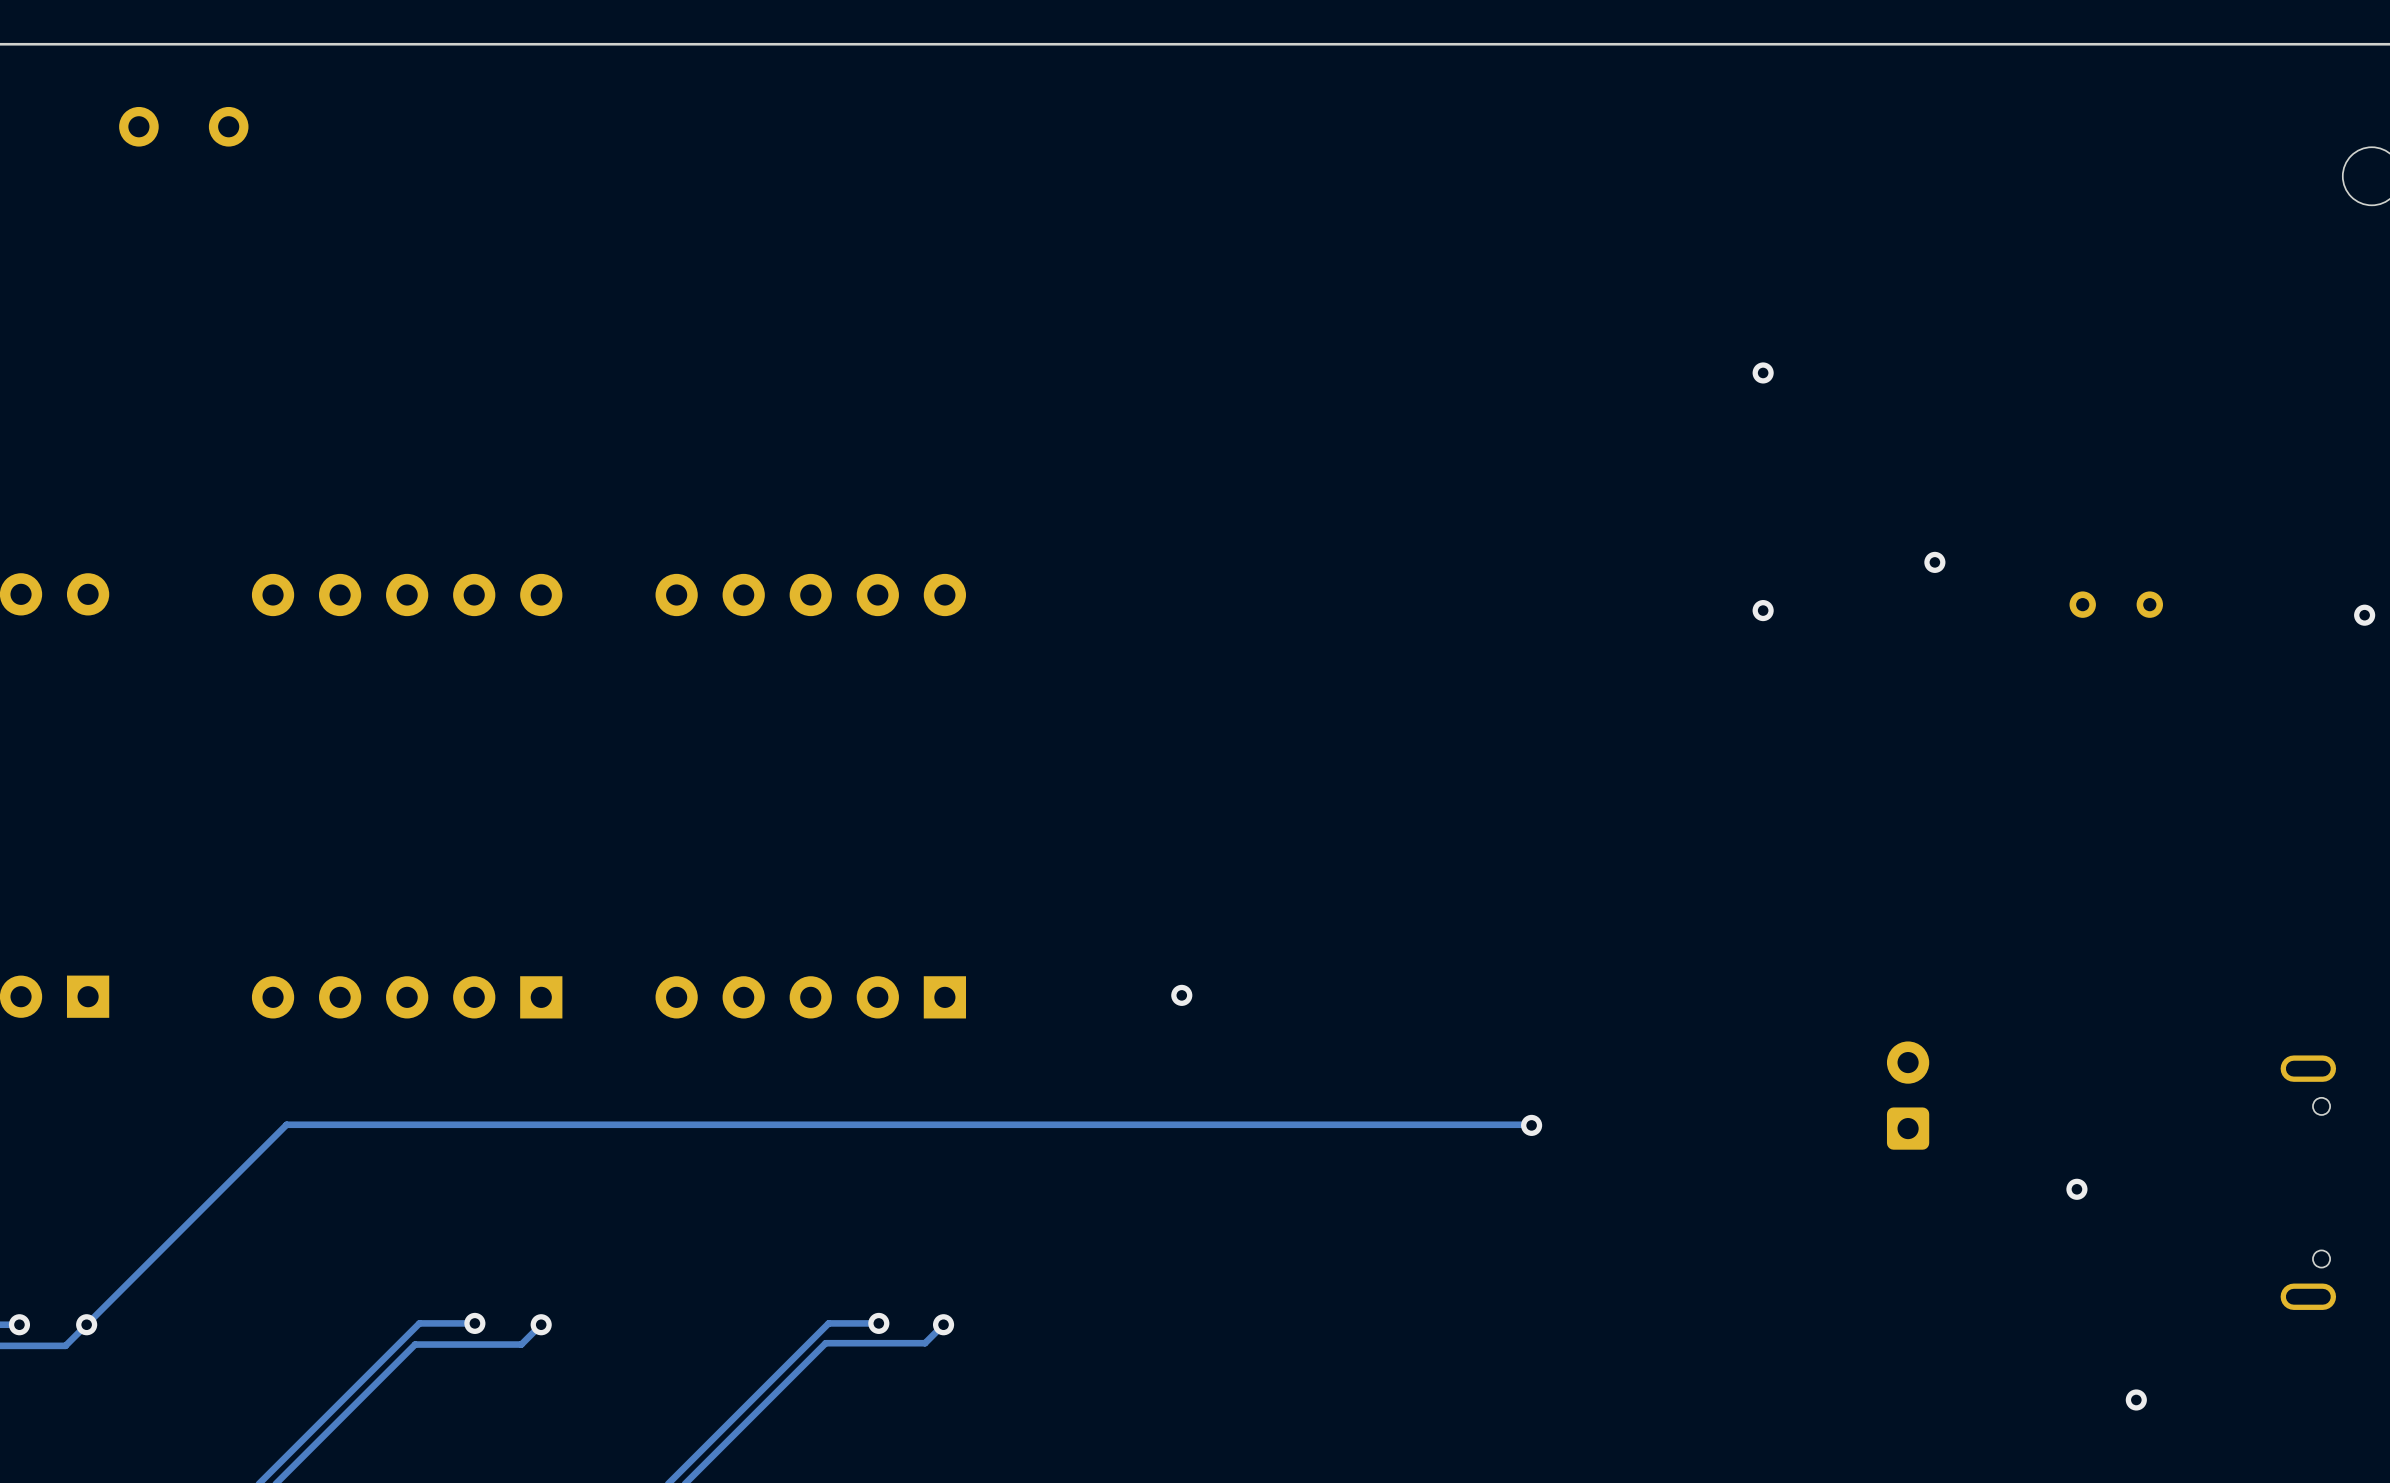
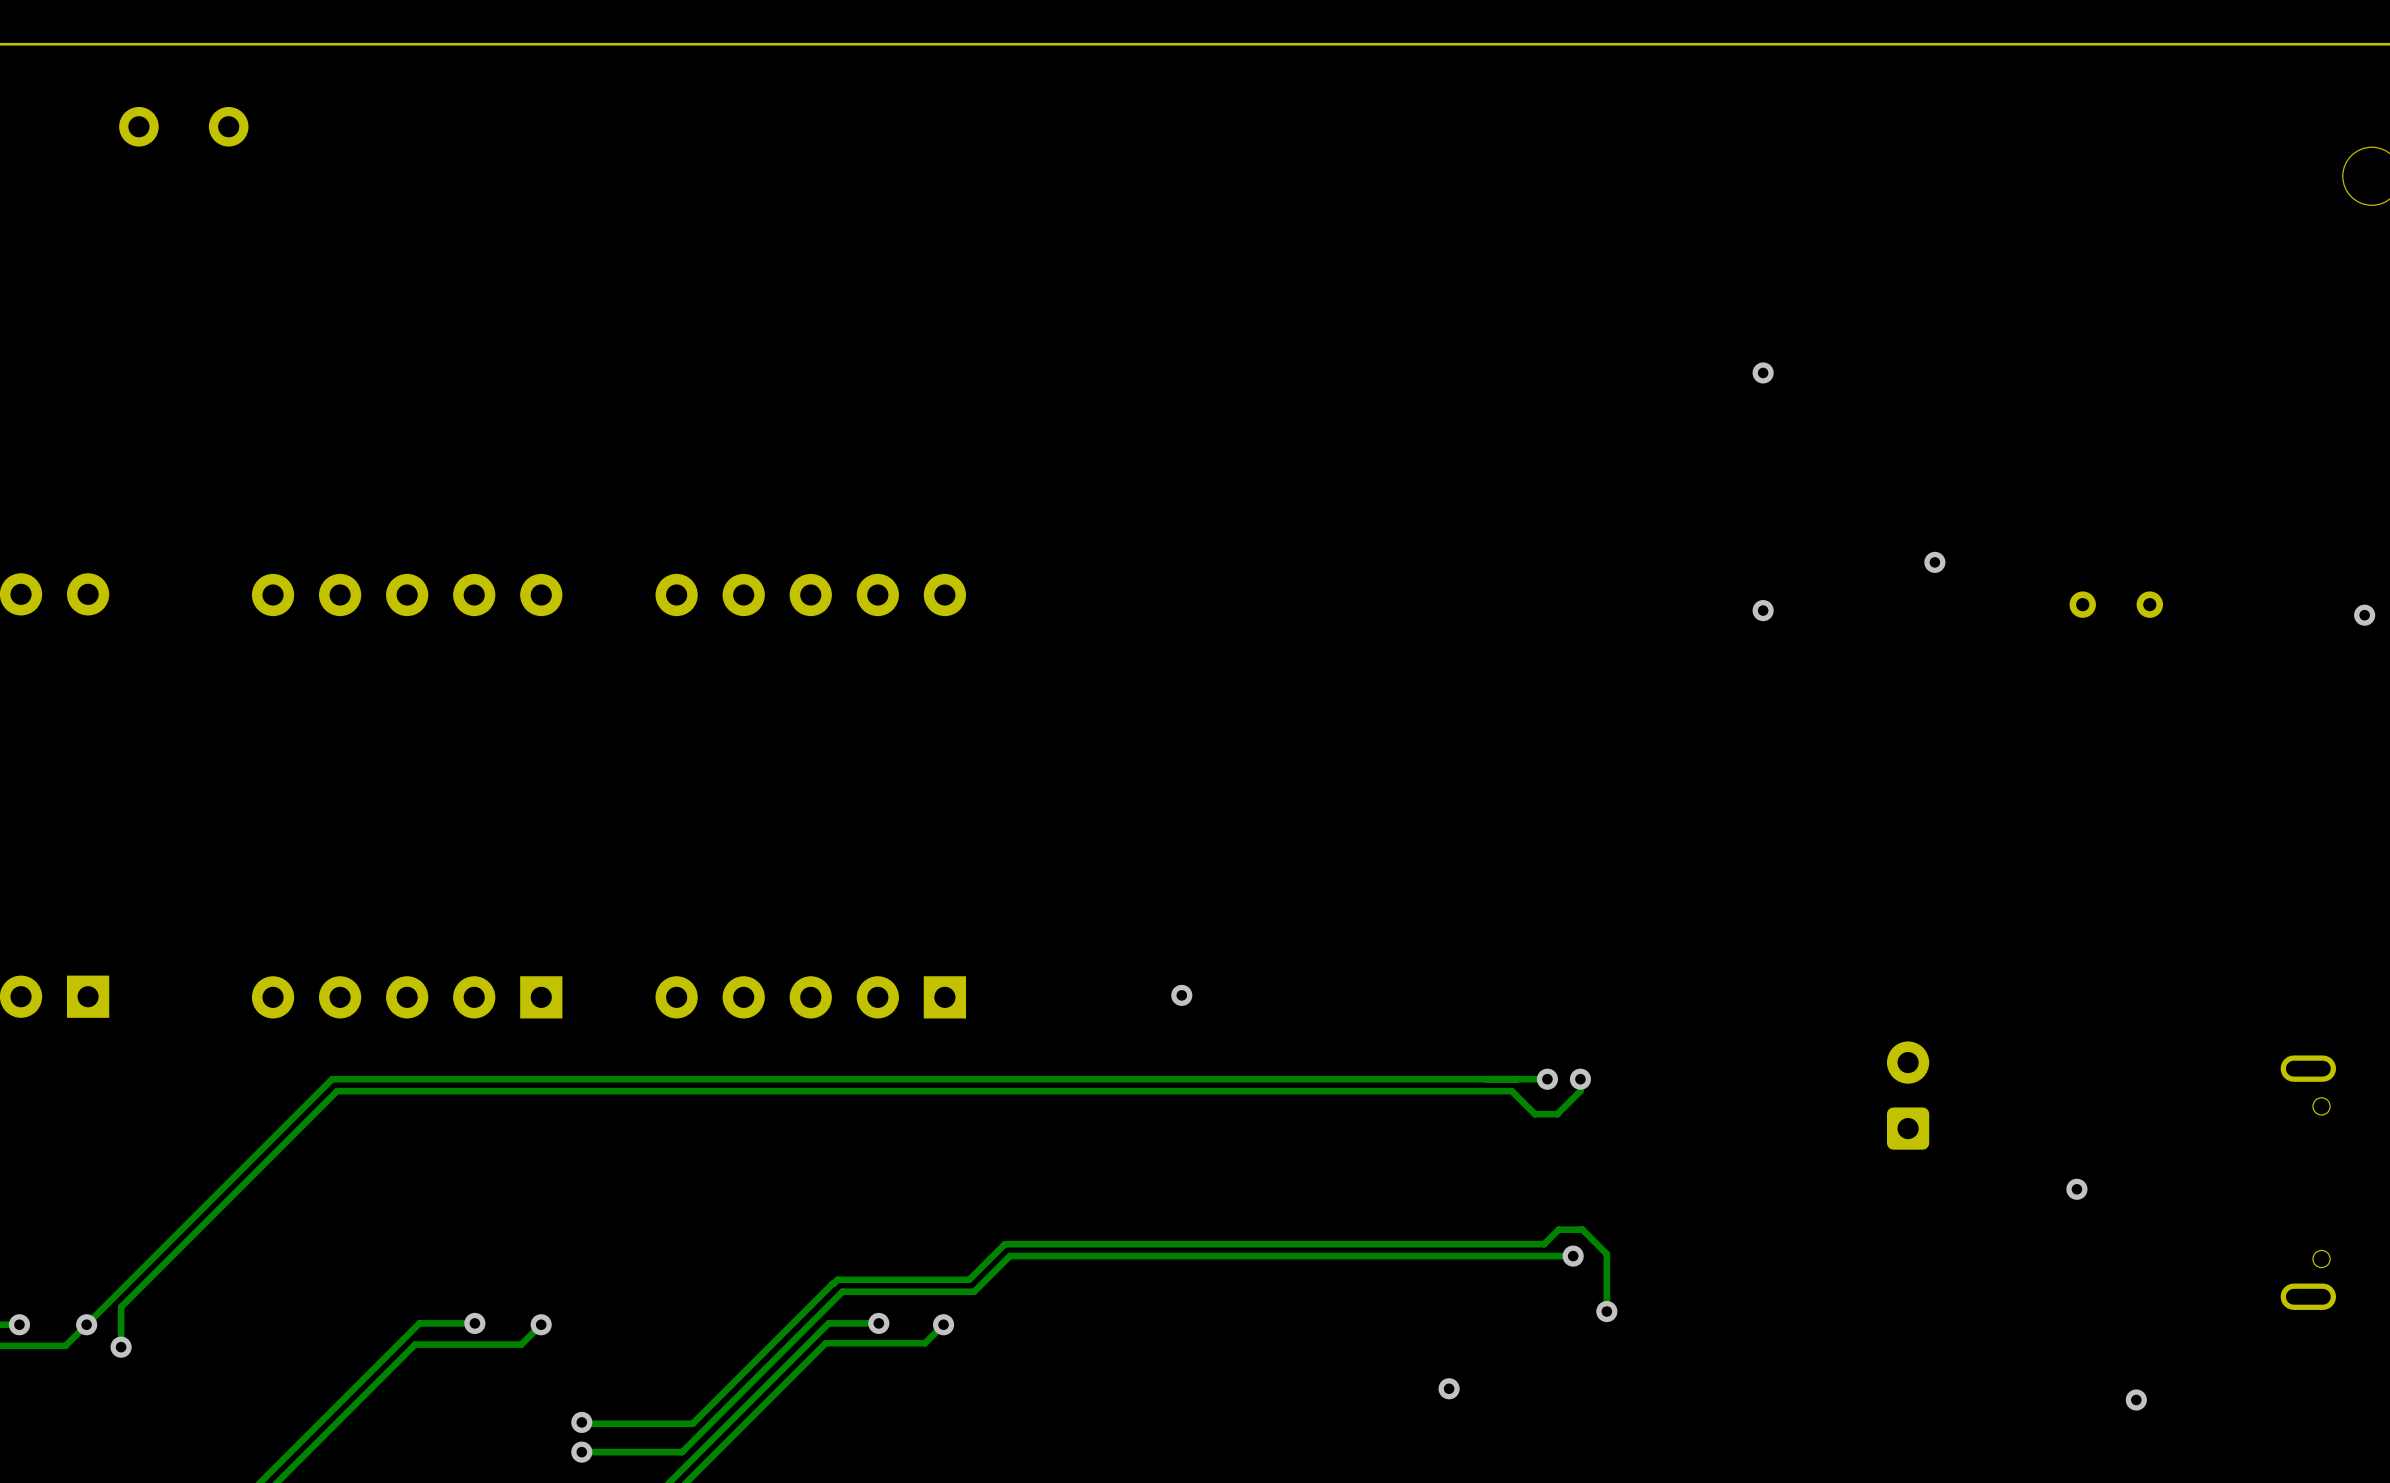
via: none -> (1547, 1079)
track: none -> (1580, 1079) (1580, 1091) (1557, 1114) (1534, 1114) (1511, 1091) (337, 1091) (121, 1307) (121, 1347)
via: none -> (1580, 1079)
track: (286, 1124) (1531, 1125) -> (286, 1124) (332, 1079) (1547, 1079)
via: (1531, 1125) -> none
track: none -> (1573, 1256) (1009, 1256) (974, 1291) (842, 1291) (682, 1452) (583, 1452)
via: none -> (1573, 1256)
track: none -> (1606, 1311) (1606, 1254) (1582, 1229) (1558, 1229) (1544, 1244) (1004, 1244) (969, 1279) (837, 1279) (692, 1423) (582, 1422)
via: none -> (1606, 1311)
via: none -> (121, 1347)
via: none -> (1449, 1388)
via: none -> (581, 1422)
via: none -> (581, 1452)

